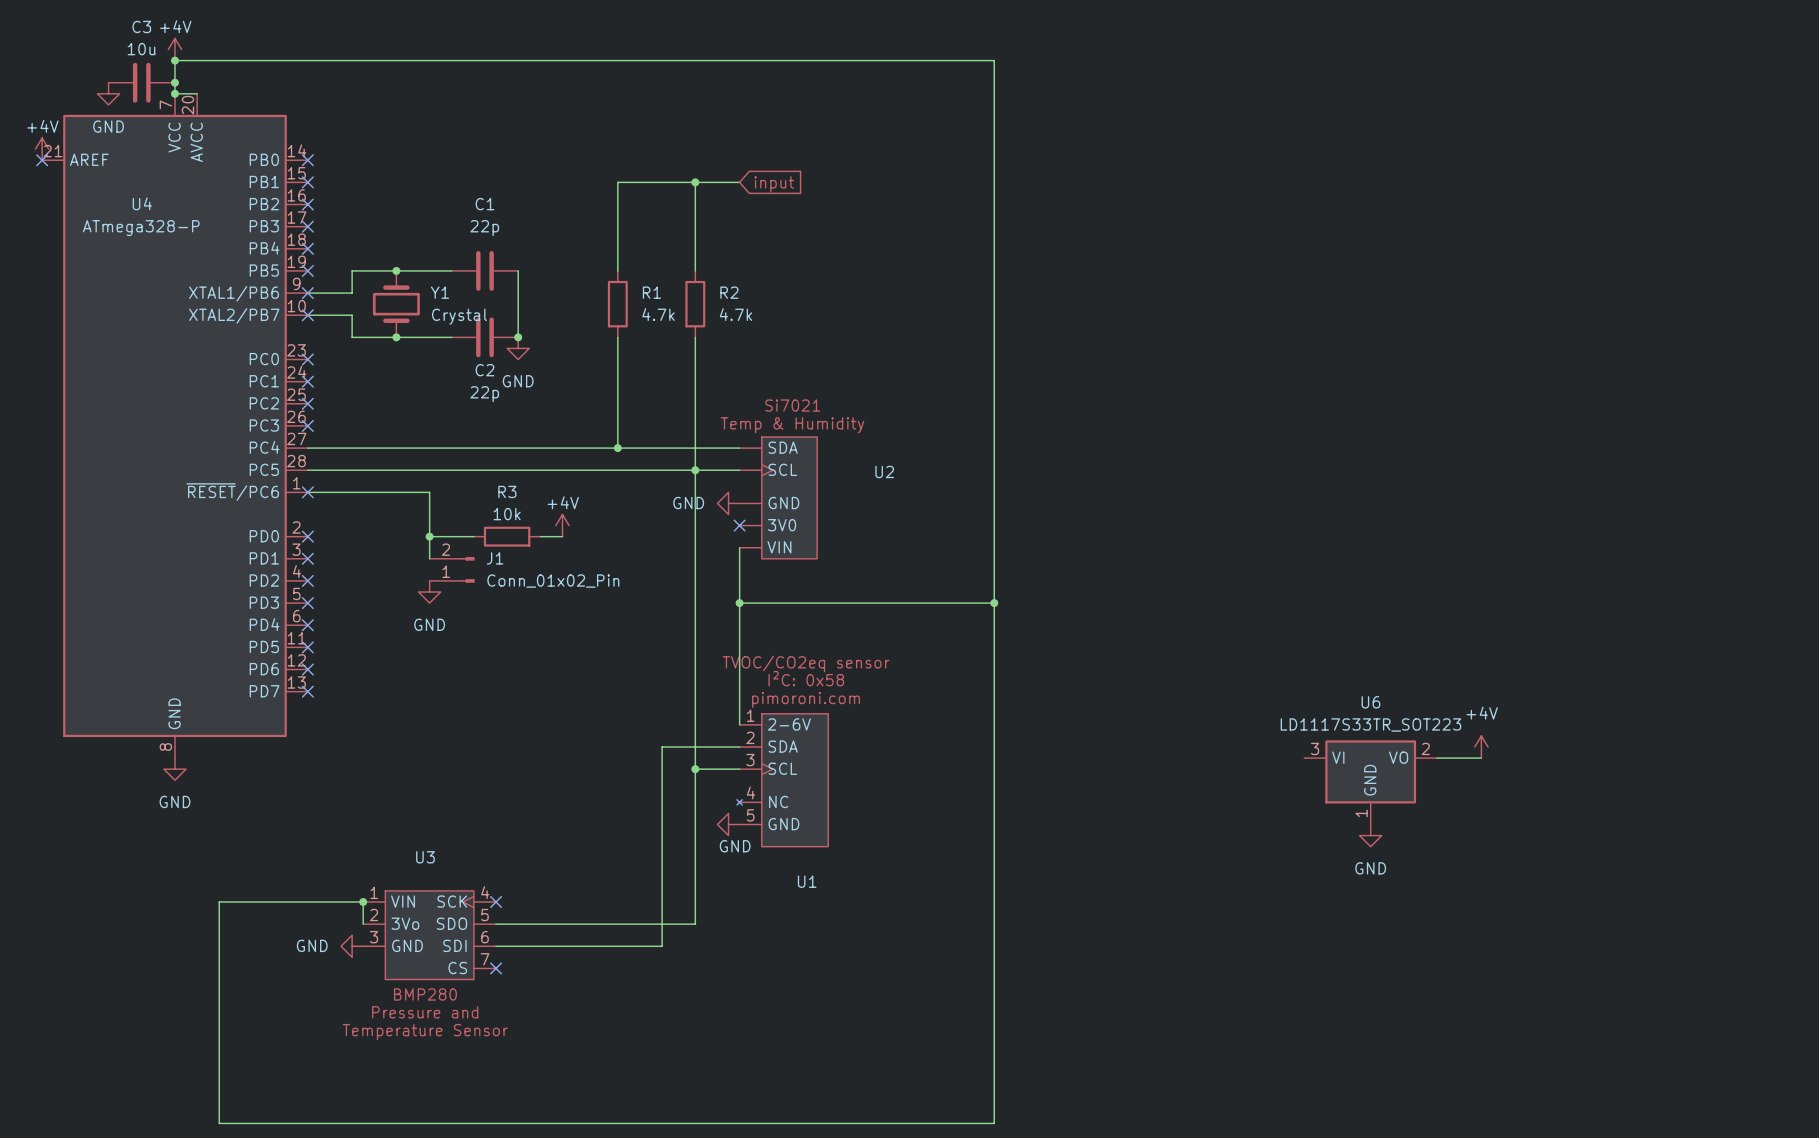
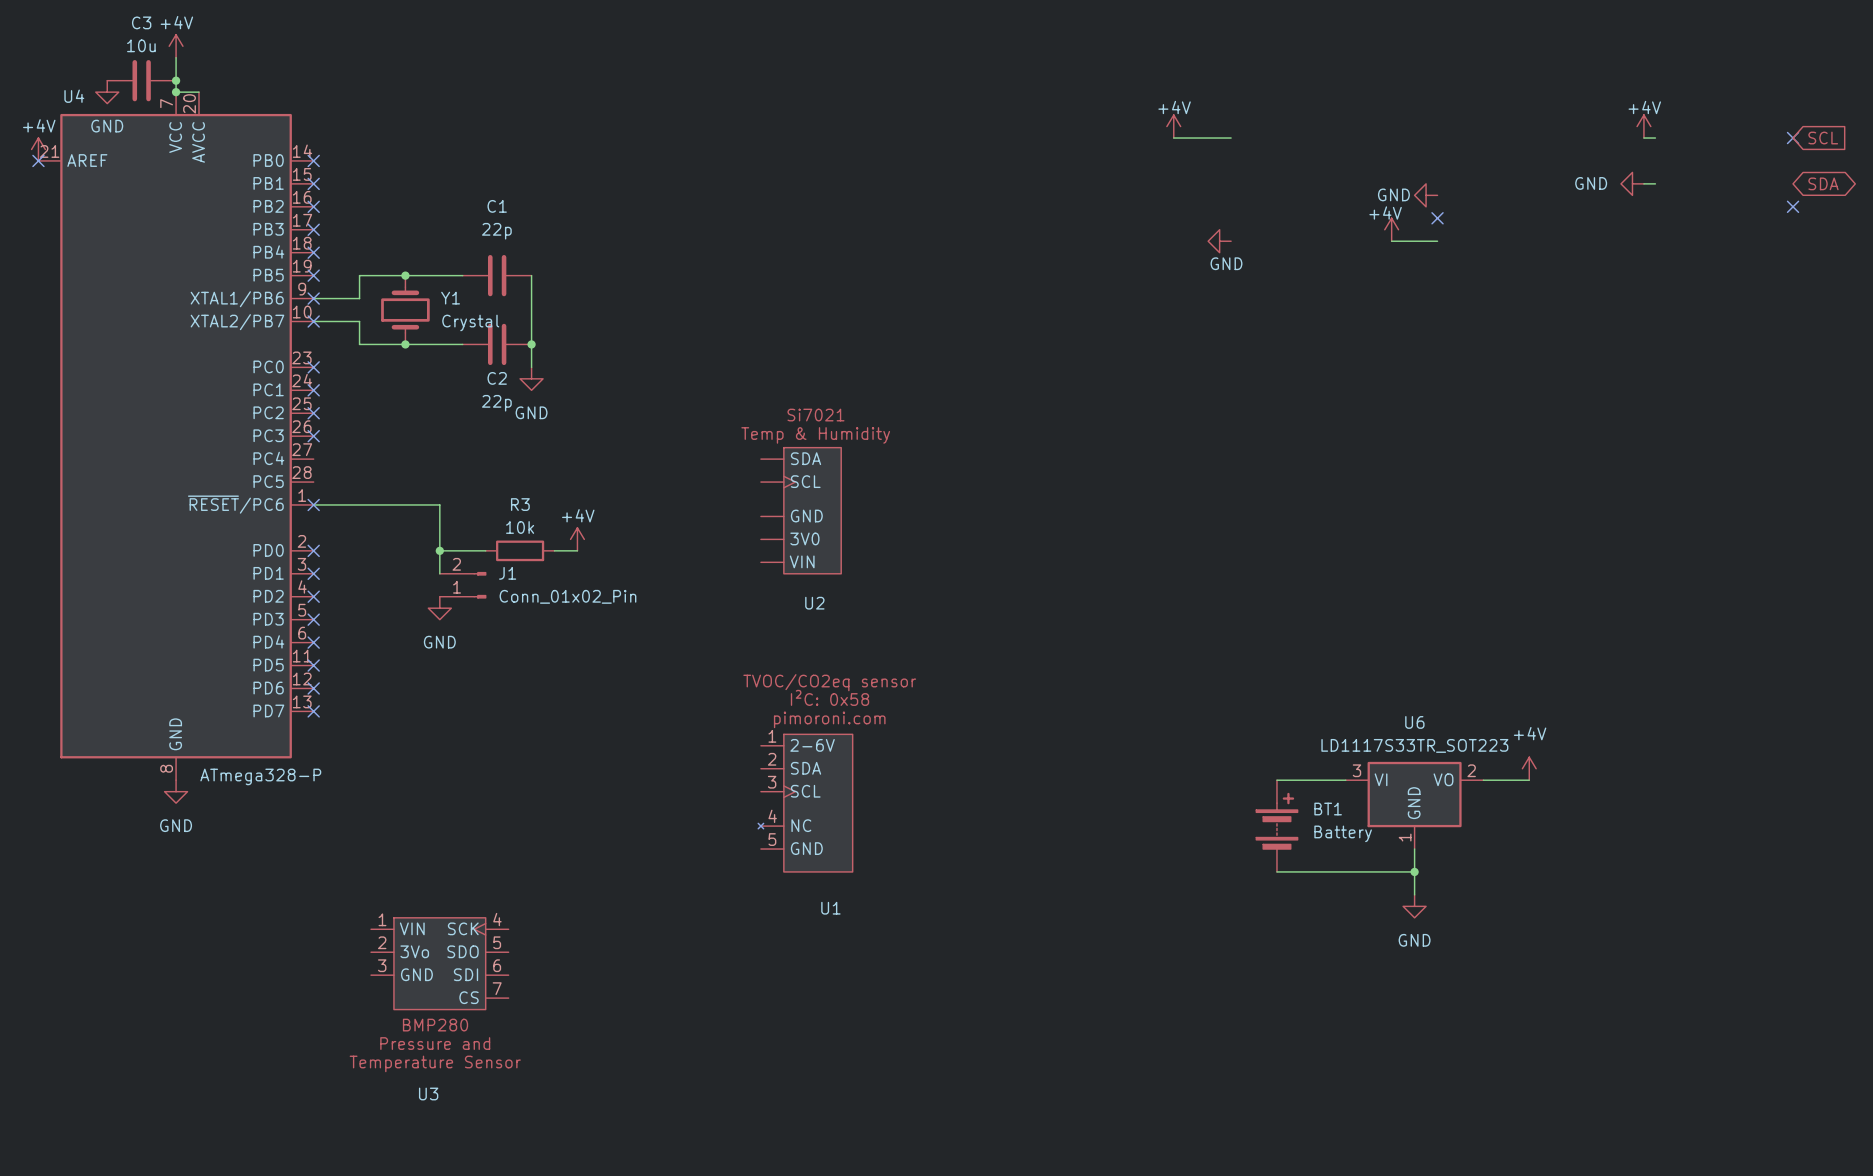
wire: (174, 60) (994, 60) (994, 1123) (219, 1123) (219, 902) (363, 902) (363, 924) -> none
junction: (174, 60) -> none
power symbol: none -> +4V (1173, 126)
power symbol: none -> +4V (1643, 126)
wire: none -> (1173, 138) (1231, 138)
wire: none -> (1643, 138) (1655, 138)
no-connect mark: none -> (1793, 138)
global label: none -> SCL (1823, 138)
wire: (695, 182) (695, 270) -> none
junction: (695, 182) -> none
wire: (739, 182) (617, 182) (617, 270) -> none
power symbol: none -> GND (1632, 183)
wire: none -> (1643, 183) (1655, 183)
global label: none -> SDA (1823, 183)
global label: input (774, 184) -> none
power symbol: none -> GND (1426, 195)
U4 name position: U4 (142, 203) -> U4 (74, 96)
no-connect mark: none -> (1793, 206)
no-connect mark: none -> (1437, 218)
power symbol: none -> +4V (1391, 229)
U4 value position: ATmega328-P (141, 228) -> ATmega328-P (260, 776)
power symbol: none -> GND (1219, 241)
wire: none -> (1391, 241) (1437, 241)
R1: 4.7k (617, 304) -> none
R2: 4.7k (695, 304) -> none
wire: (617, 337) (617, 448) -> none
wire: (695, 337) (695, 924) (496, 924) -> none
power symbol position: GND (518, 348) -> GND (531, 378)
wire: (307, 448) (739, 448) -> none
junction: (617, 448) -> none
wire: (307, 470) (739, 470) -> none
junction: (695, 470) -> none
U2 name position: U2 (884, 471) -> U2 (814, 603)
power symbol: GND (728, 503) -> none
no-connect mark: (739, 525) -> none
wire: (739, 547) (739, 724) -> none
wire: (739, 603) (994, 603) -> none
junction: (739, 603) -> none
junction: (994, 603) -> none
wire: (739, 747) (662, 747) (662, 946) (496, 946) -> none
wire: none -> (1276, 780) (1345, 780)
wire: (695, 769) (739, 769) -> none
junction: (695, 769) -> none
BT1: none -> Battery (1276, 826)
power symbol: GND (728, 824) -> none
wire: none -> (1414, 849) (1414, 894)
power symbol position: GND (1370, 835) -> GND (1414, 906)
wire: none -> (1276, 871) (1414, 871)
junction: none -> (1414, 871)
U3 name position: U3 (425, 857) -> U3 (428, 1094)
junction: (363, 902) -> none
no-connect mark: (496, 902) -> none
power symbol: GND (352, 946) -> none
no-connect mark: (496, 968) -> none

